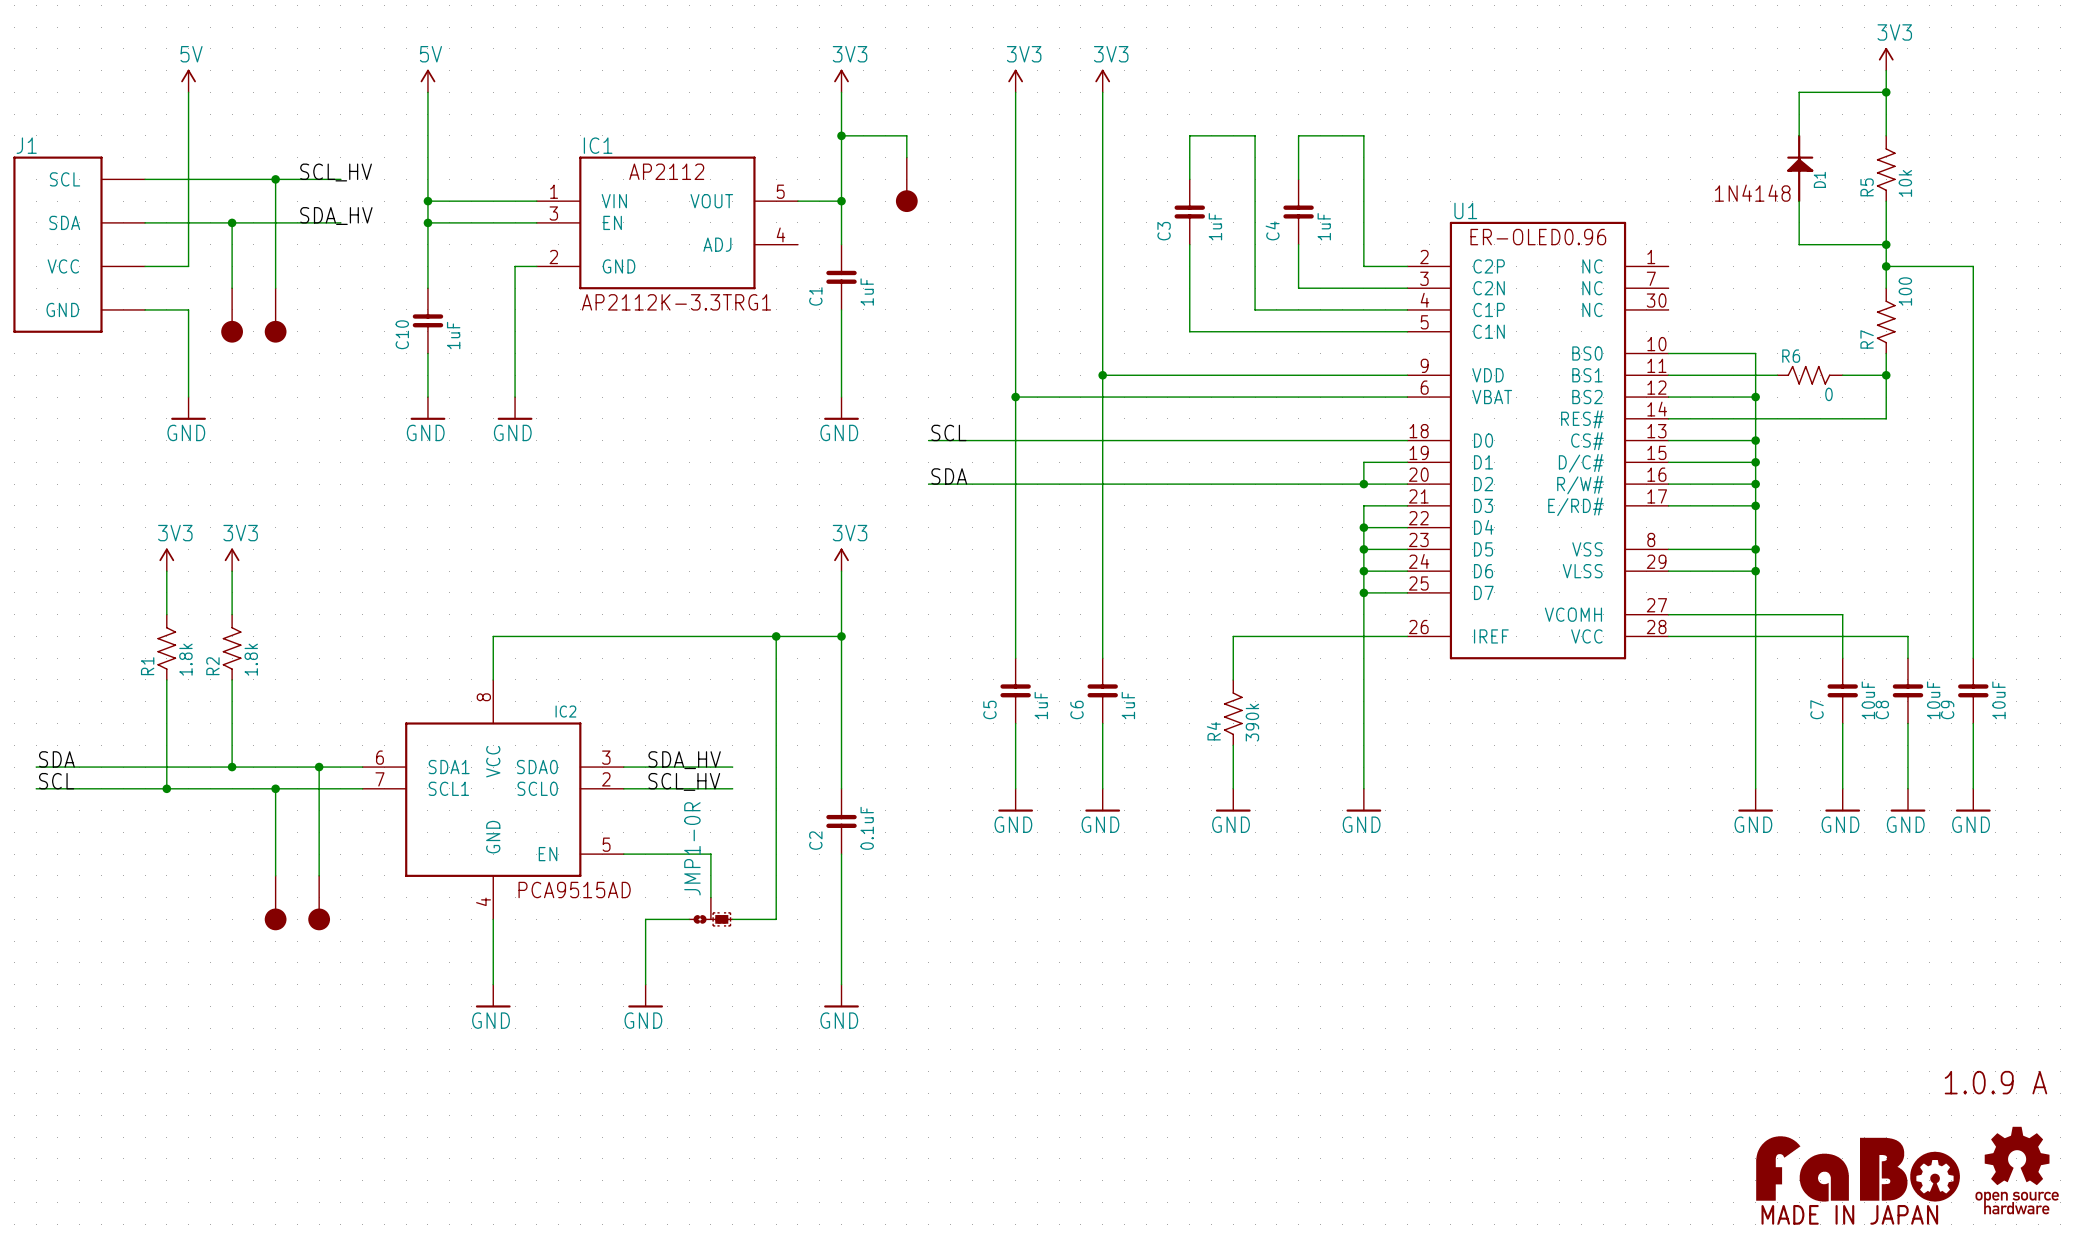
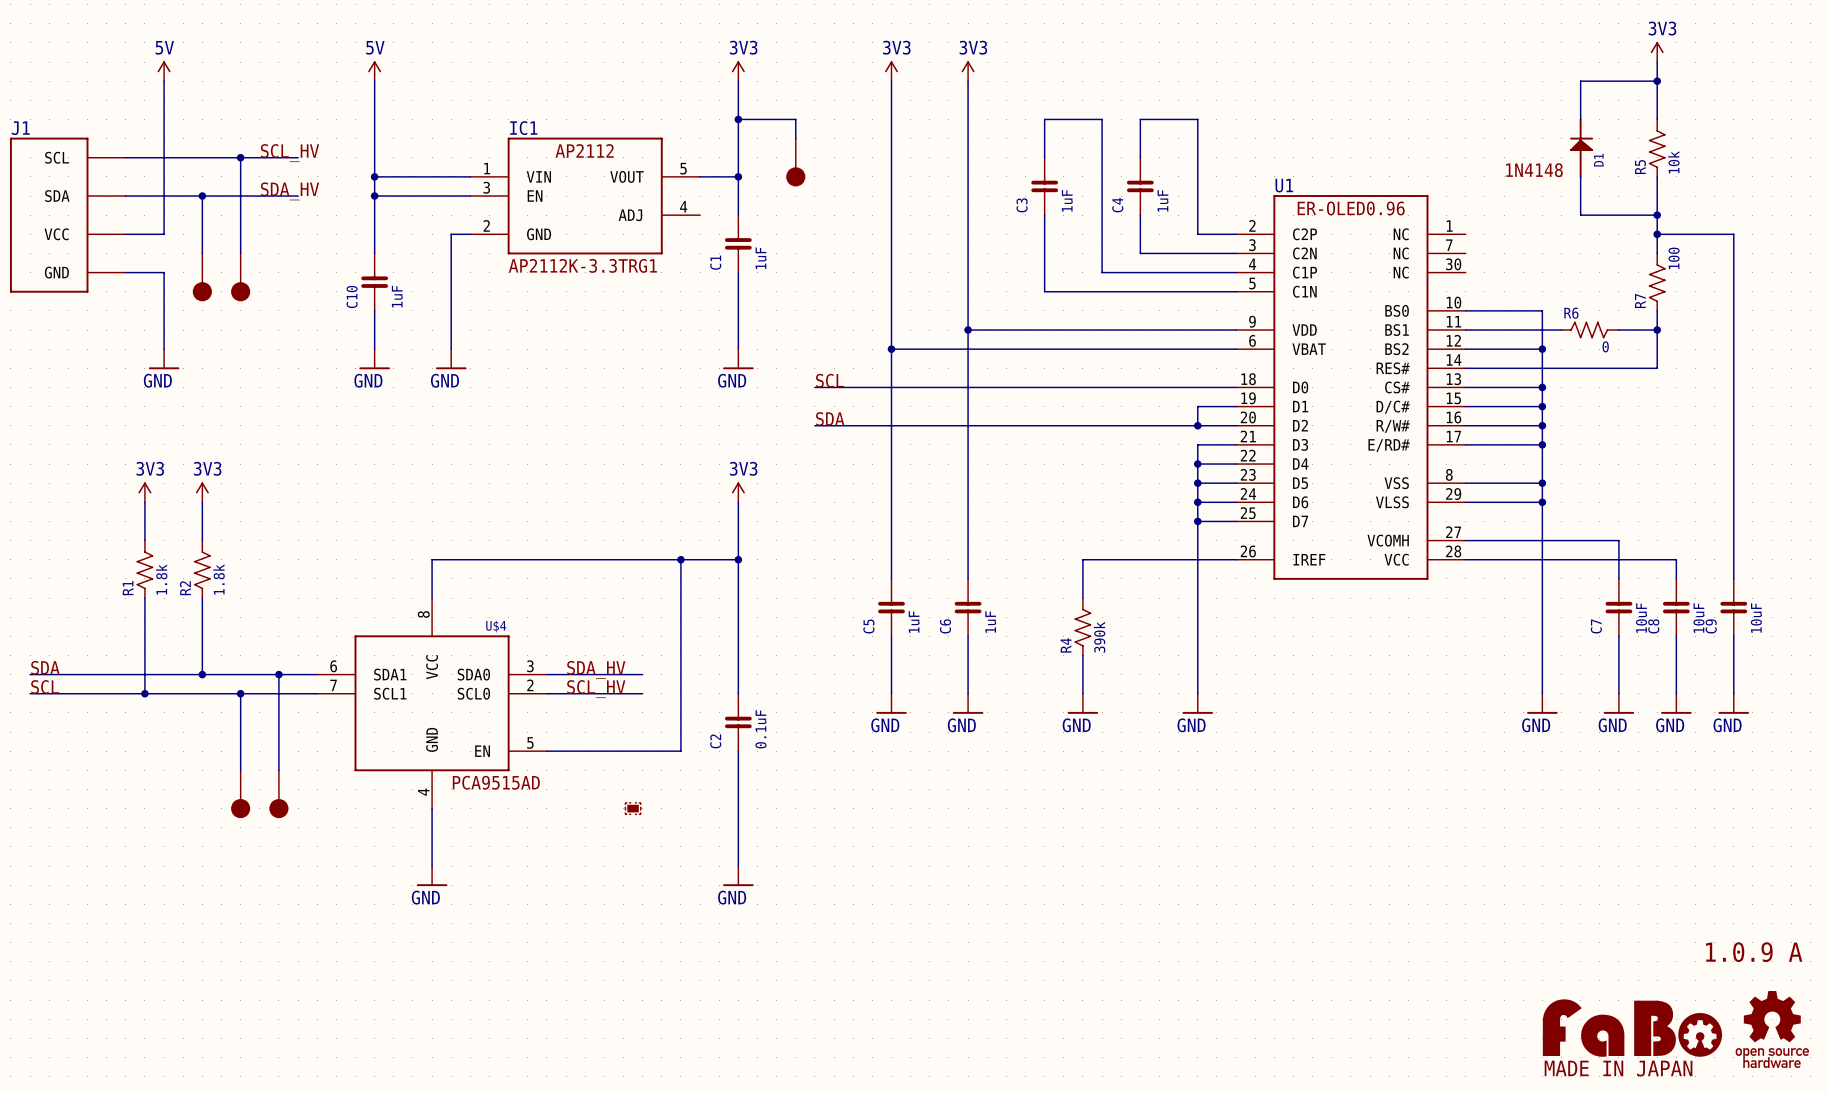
IC2 name: IC2 (565, 711) -> U$4 (496, 626)
wire: (710, 854) (710, 897) -> none
wire: (776, 854) (776, 919) (732, 919) -> (680, 751) (623, 751)
JMP1-0R: (710, 910) -> none
wire: (689, 919) (645, 919) (645, 984) -> none
power symbol: GND (645, 996) -> none

